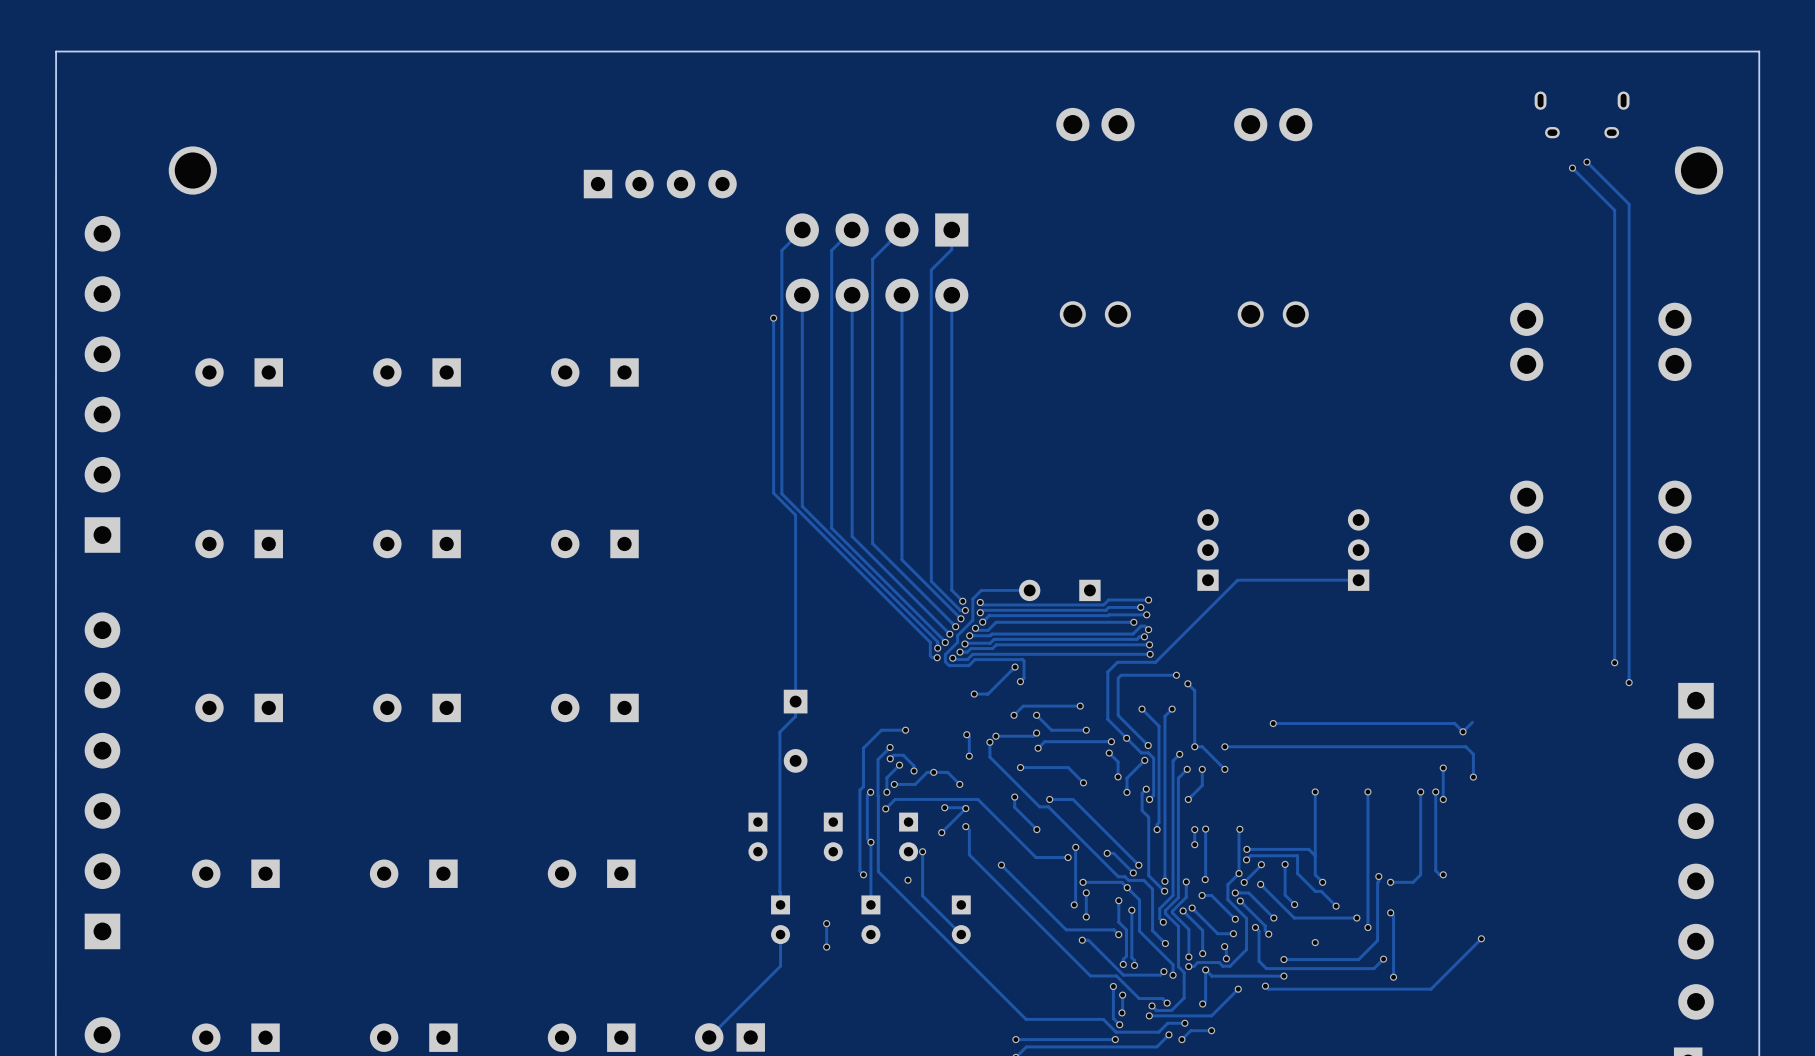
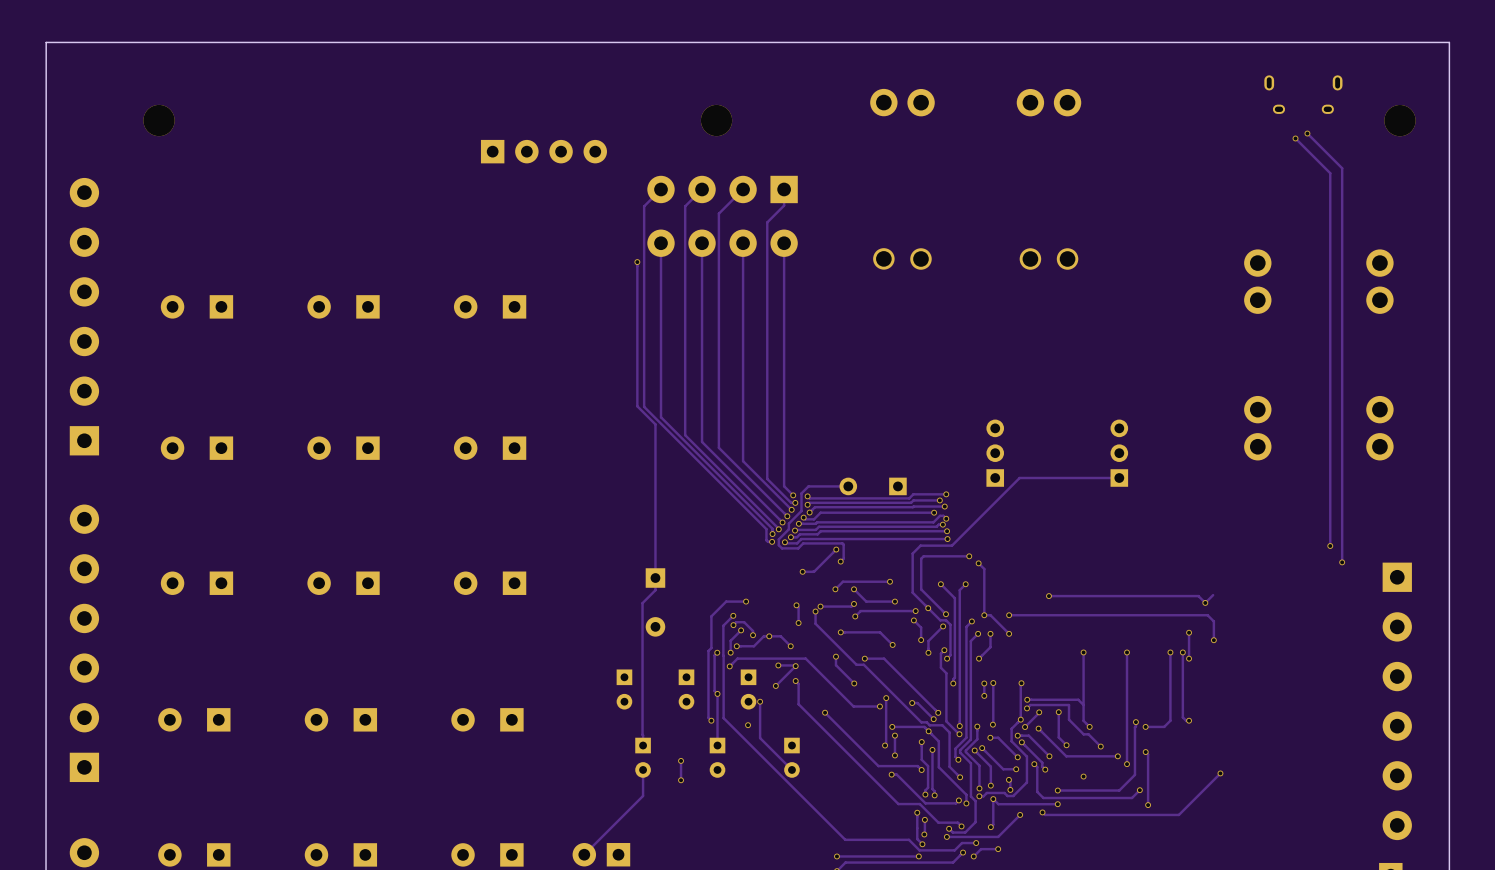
part: none -> (159, 120)
part: none -> (716, 120)
part: none -> (1400, 120)
part: (192, 170) -> none
part: (1699, 170) -> none

